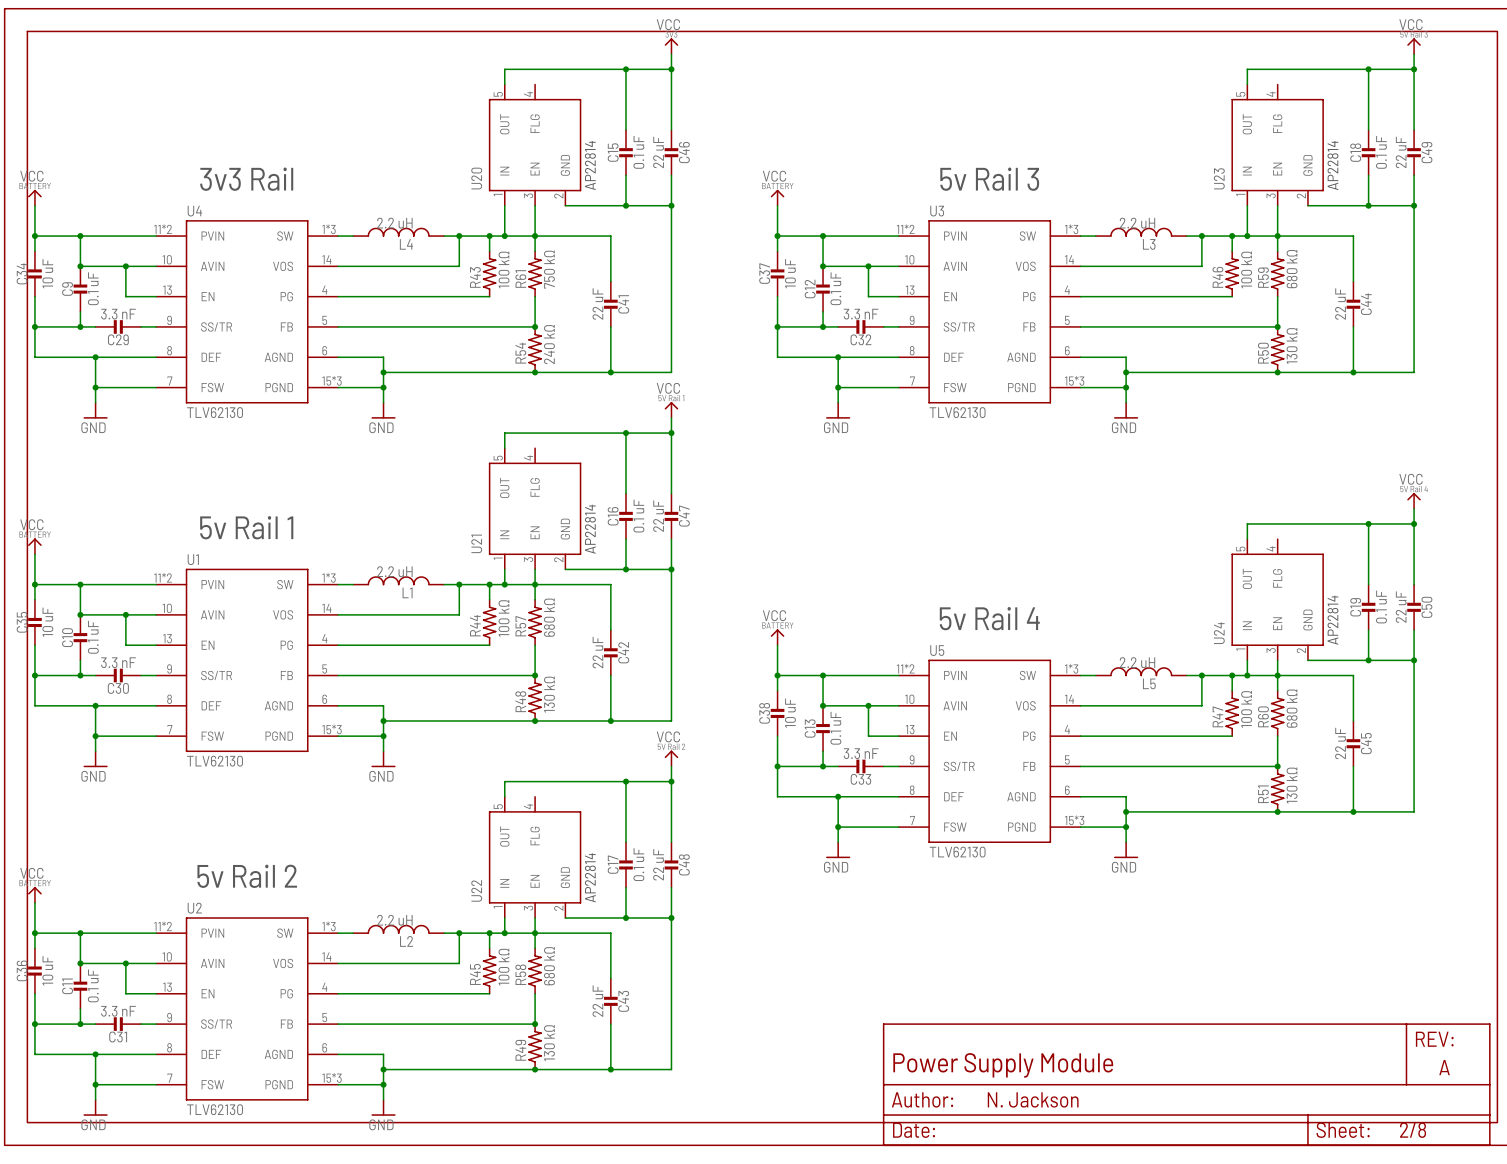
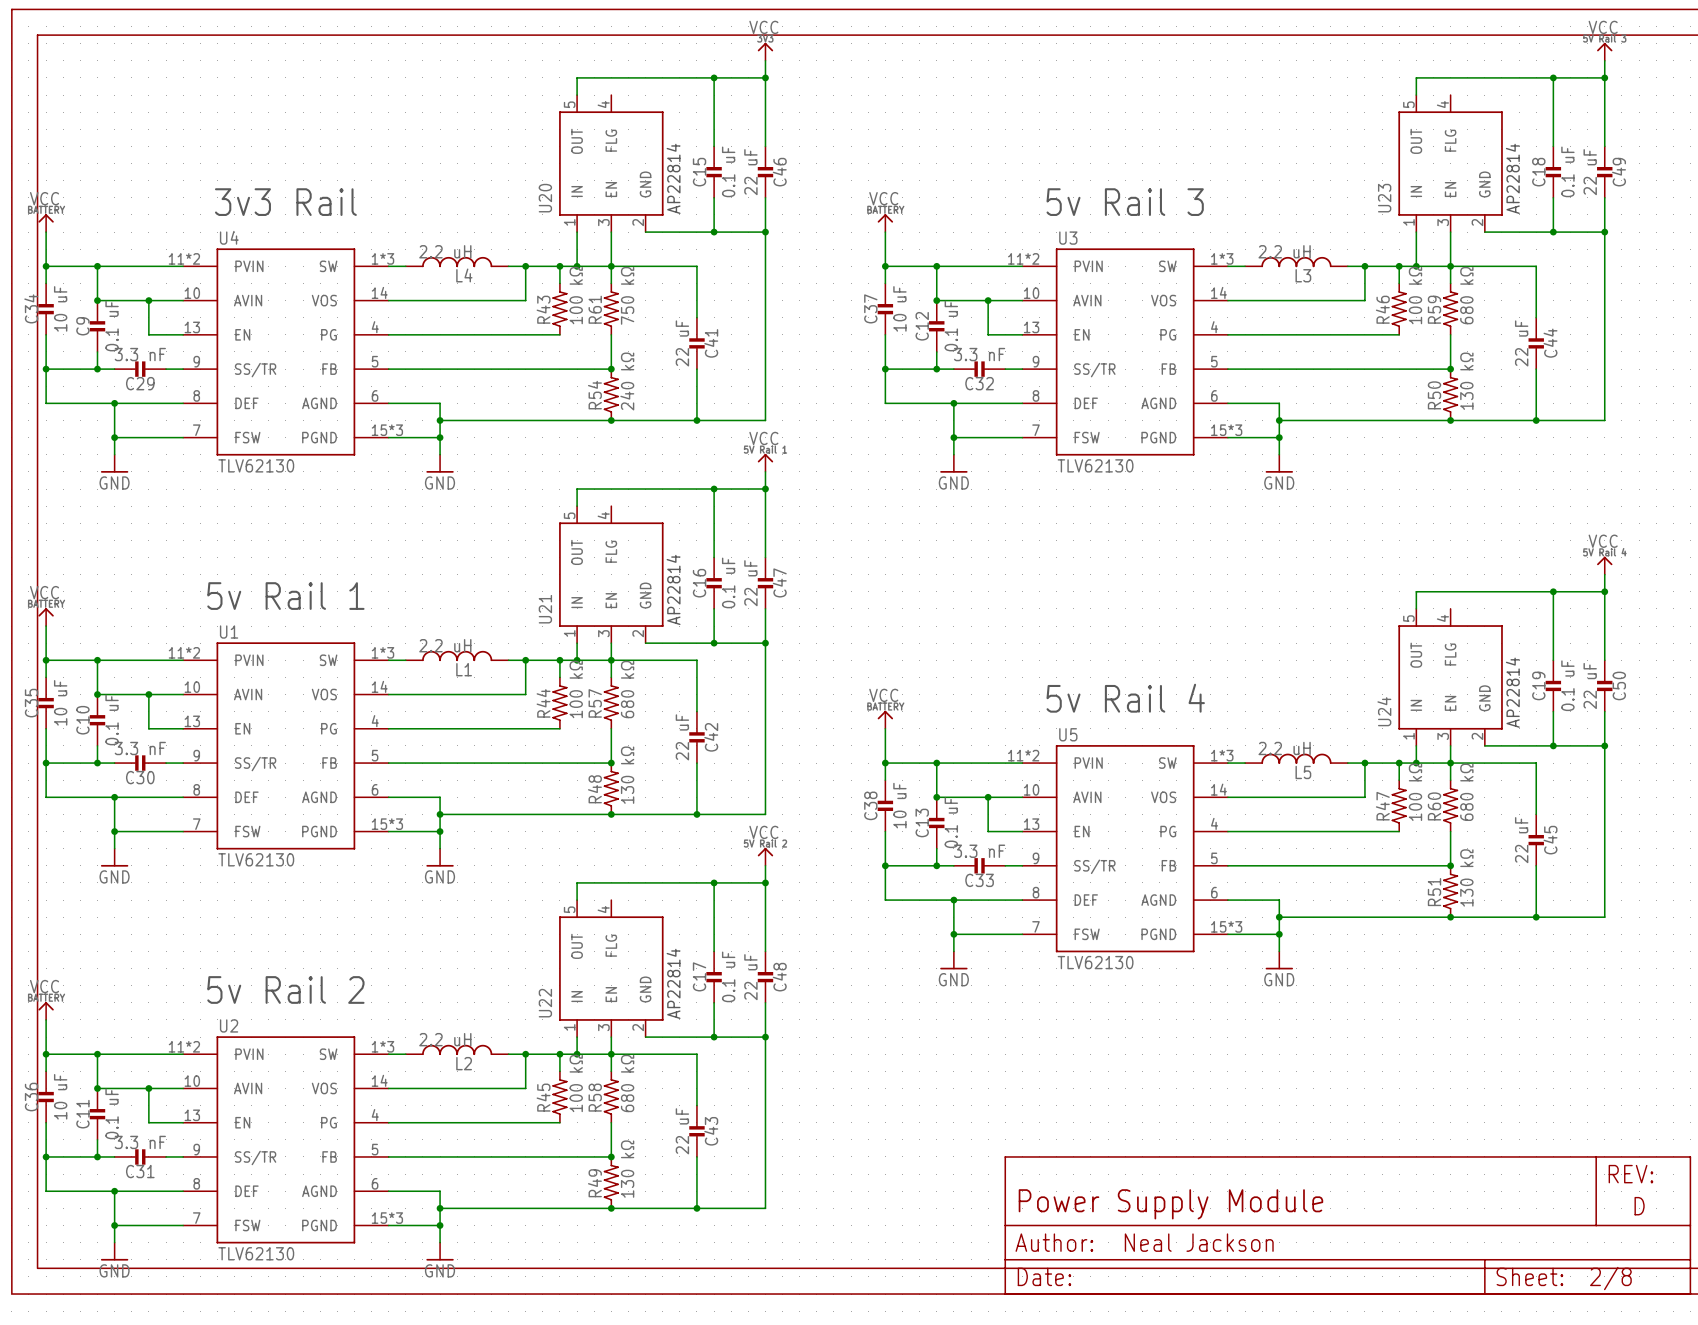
part text: A (1444, 1067) -> D (1639, 1206)
part text: N. Jackson (1033, 1099) -> Neal Jackson (1199, 1242)

